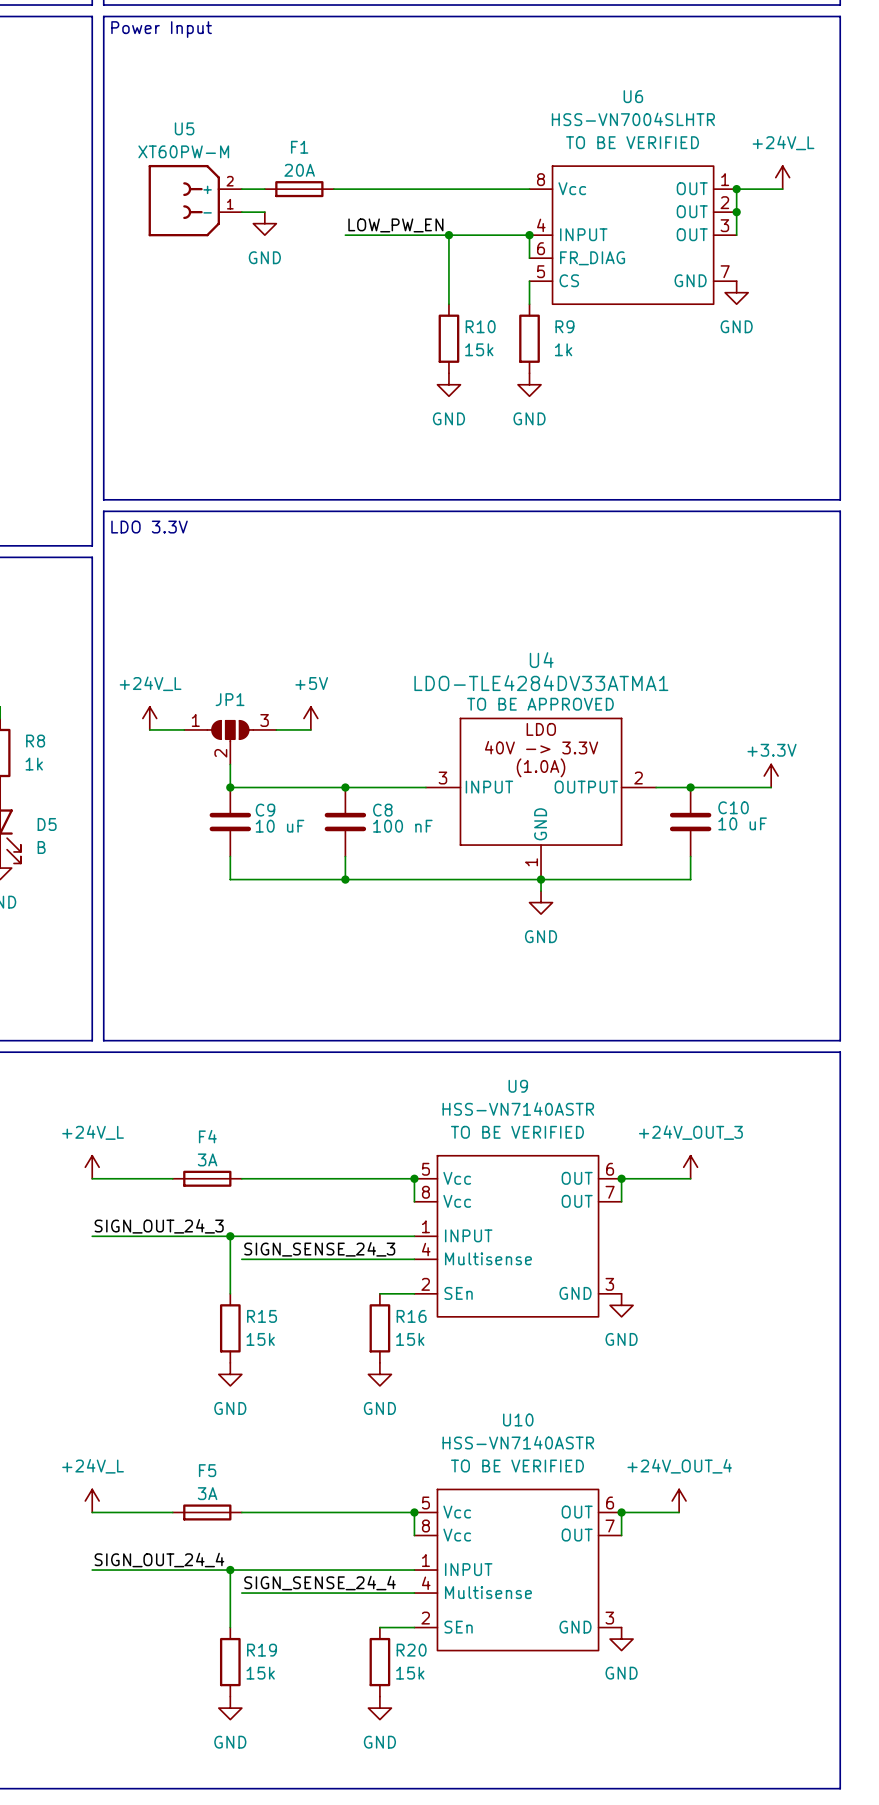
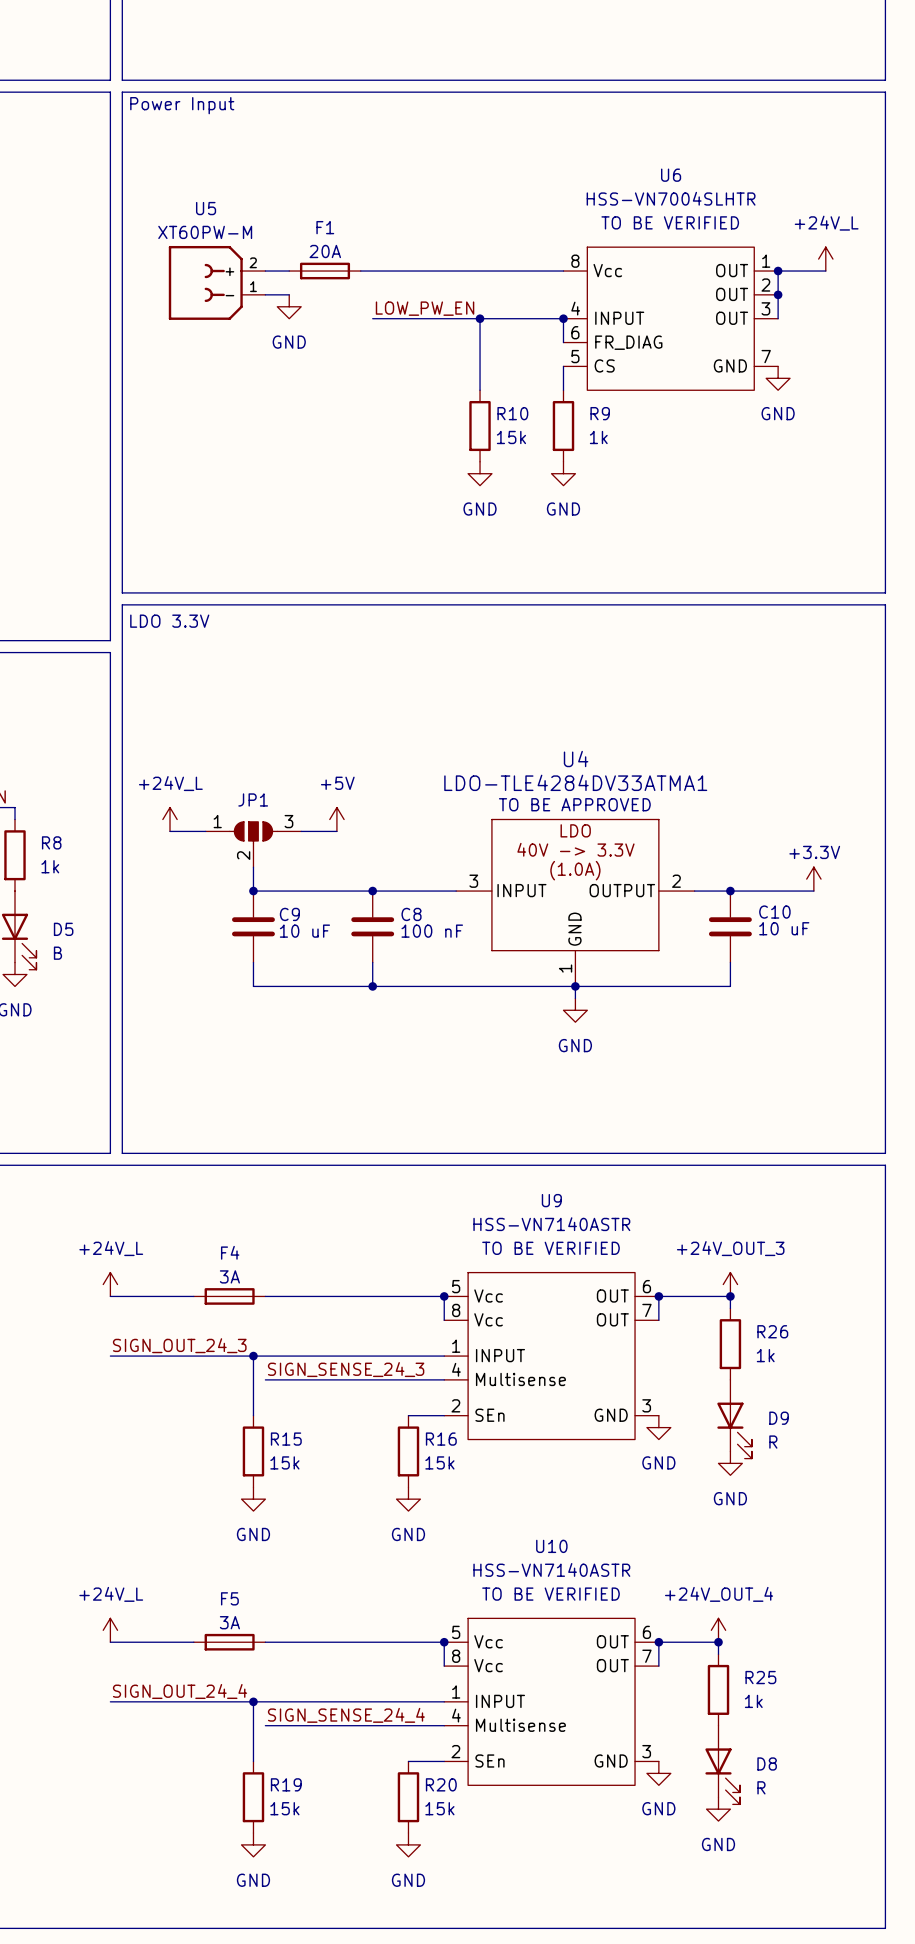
wire: none -> (730, 1296) (730, 1308)
junction: none -> (730, 1296)
R26: none -> 1k (730, 1344)
D9: none -> R (734, 1419)
power symbol: none -> GND (730, 1463)
wire: none -> (718, 1642) (718, 1654)
junction: none -> (718, 1642)
R25: none -> 1k (718, 1689)
D8: none -> R (722, 1765)
power symbol: none -> GND (718, 1809)

